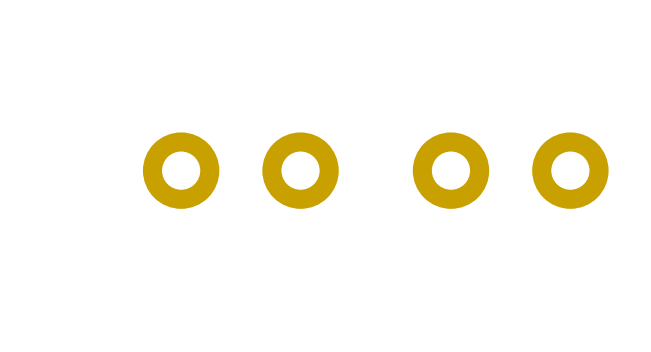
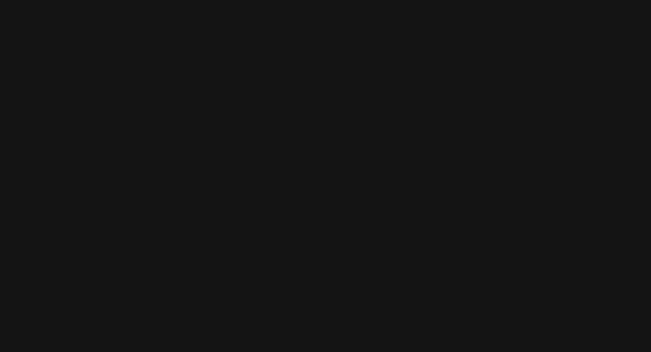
part: (240, 170) -> none
part: (510, 170) -> none

